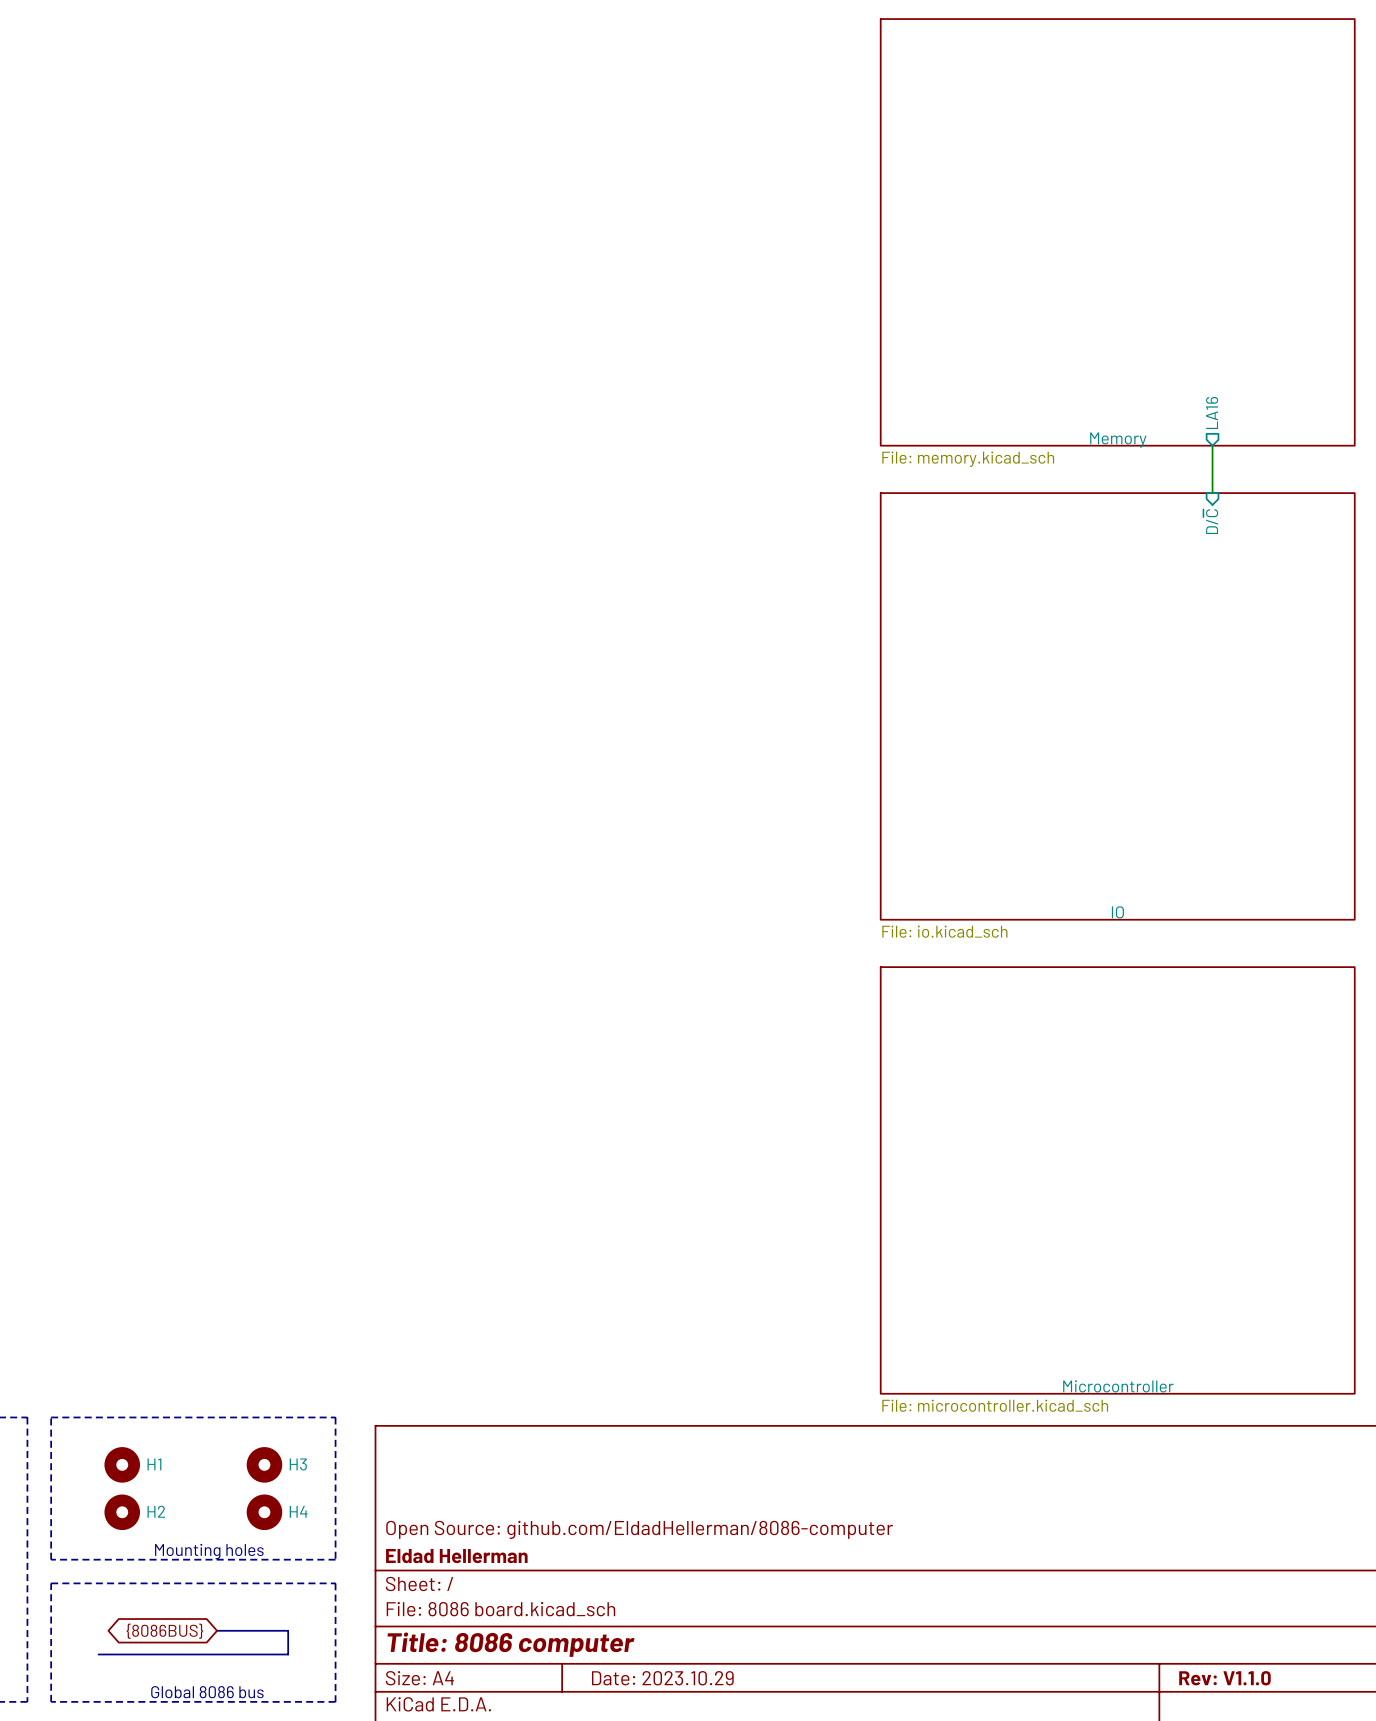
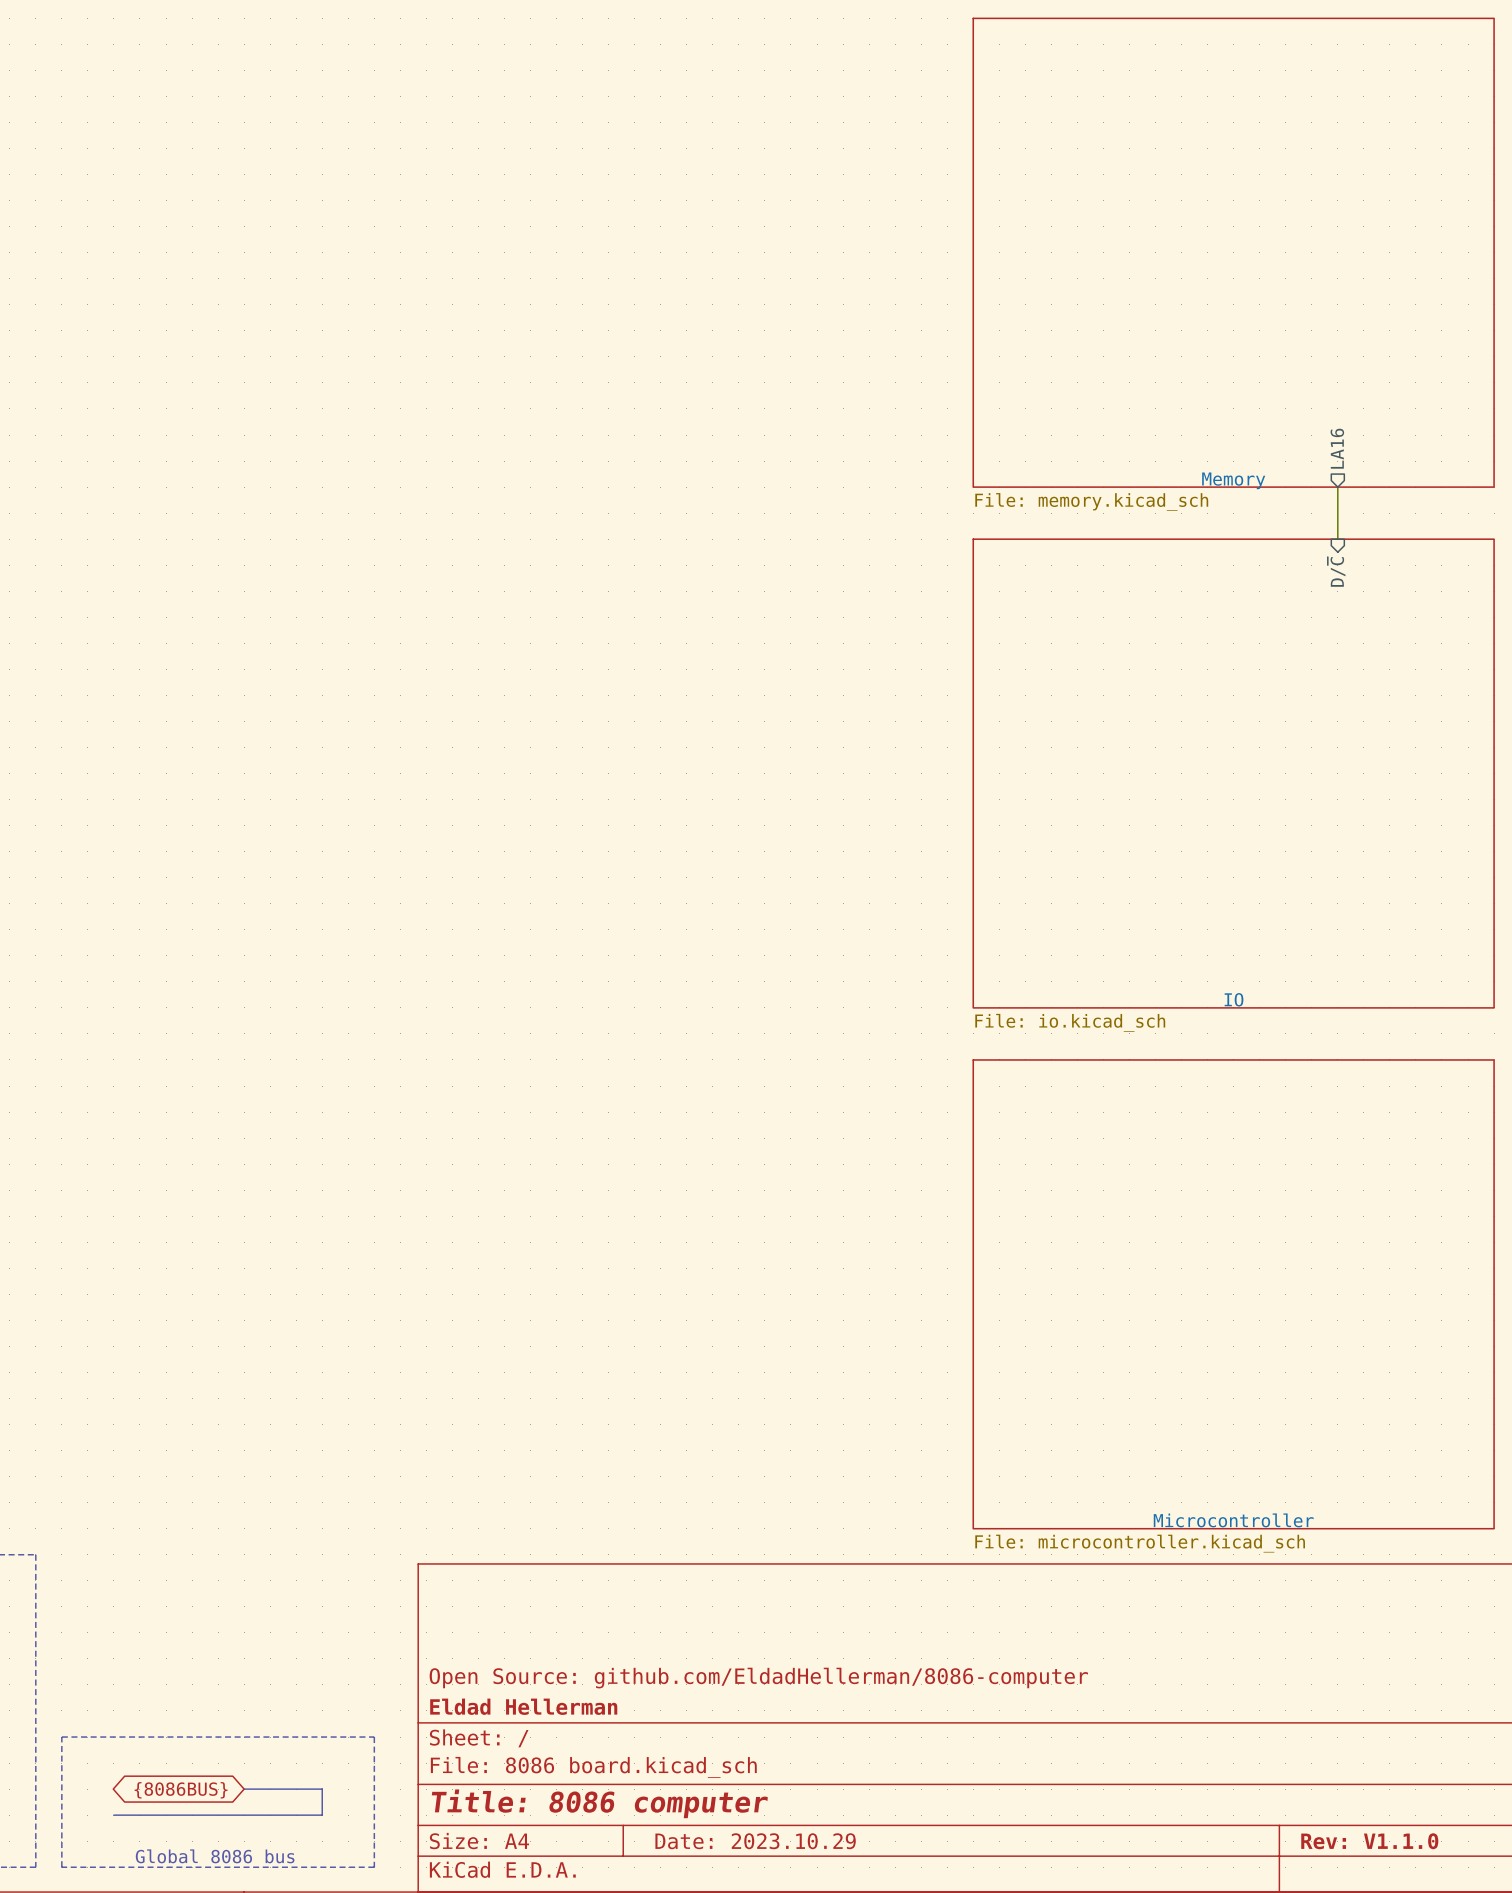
line: (51, 1417) (335, 1417) (335, 1559) (51, 1559) (51, 1417) -> none
H1: (122, 1464) -> none
H3: (264, 1464) -> none
H2: (122, 1512) -> none
H4: (264, 1512) -> none
text: Mounting holes (209, 1551) -> none

